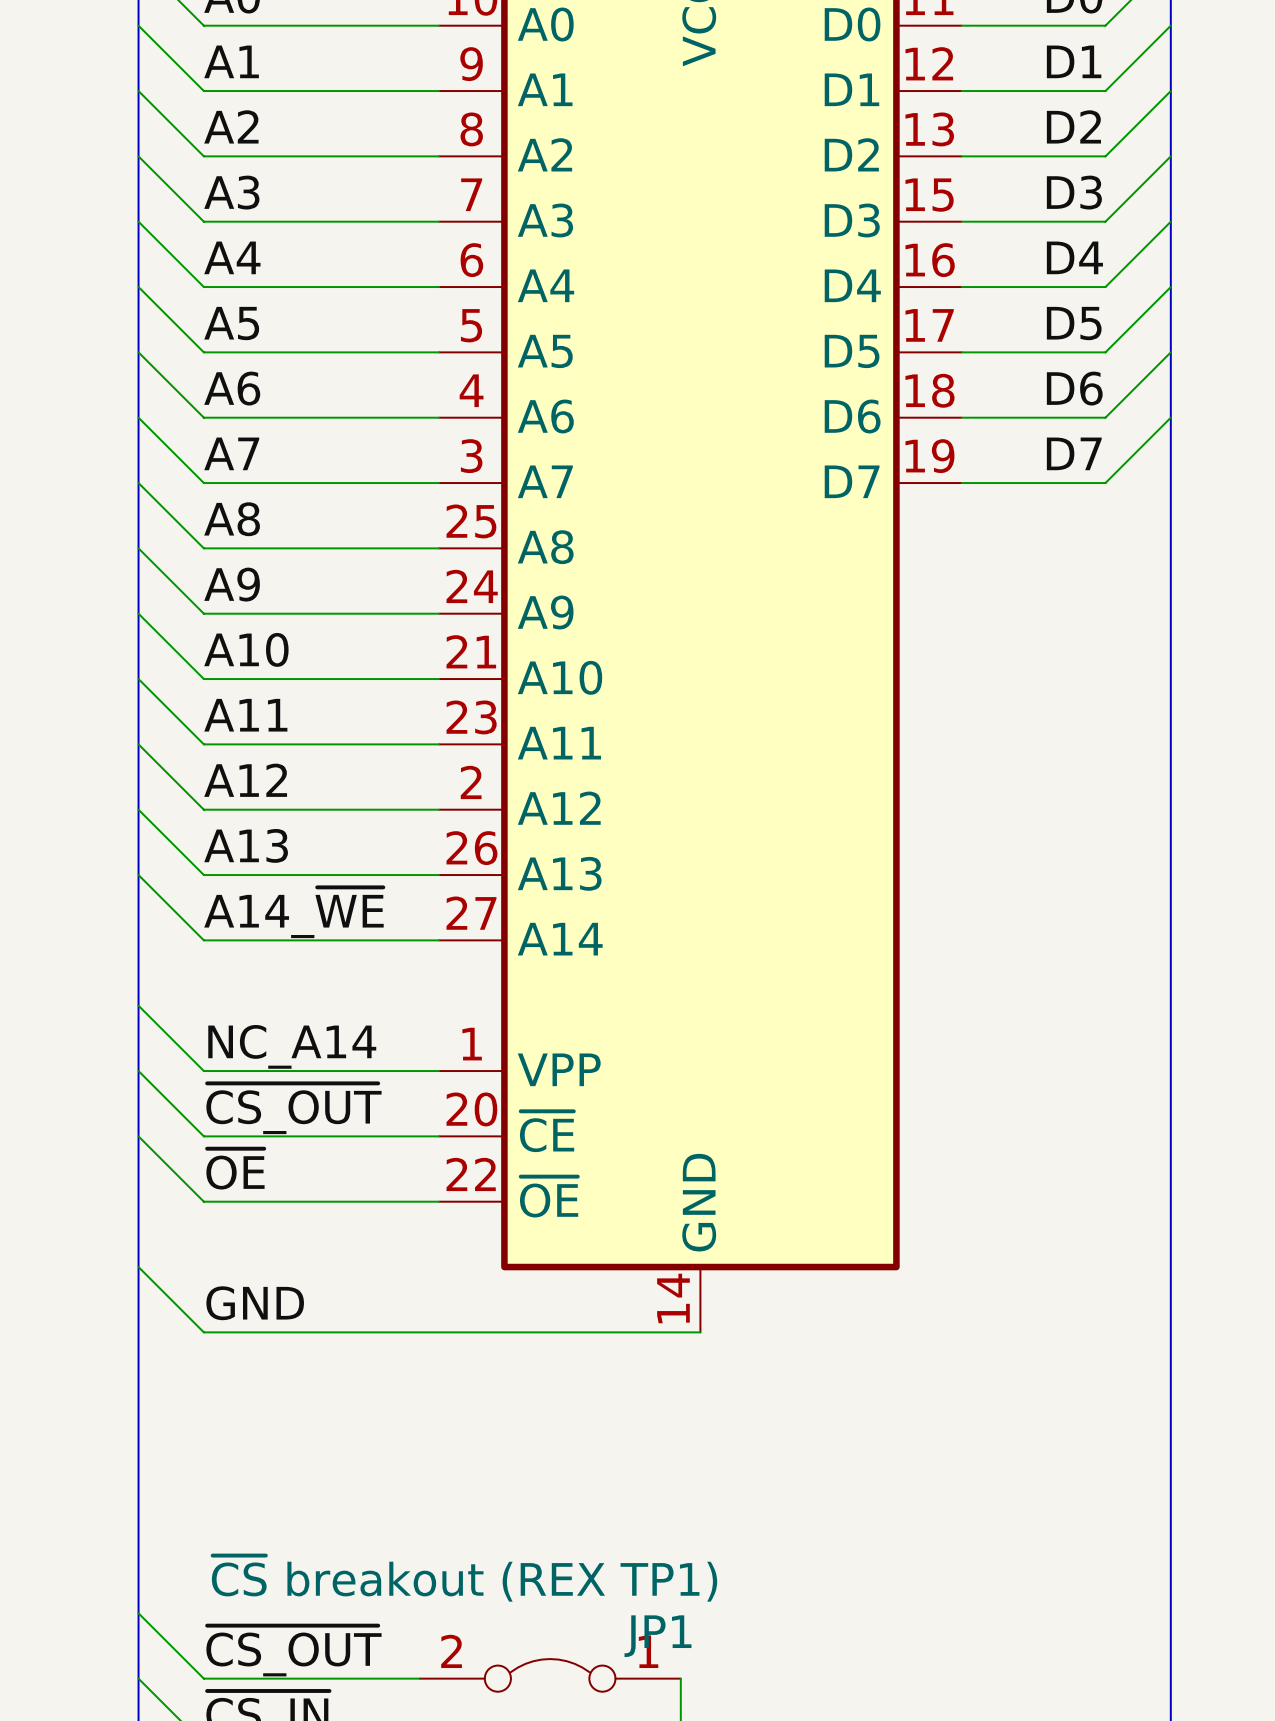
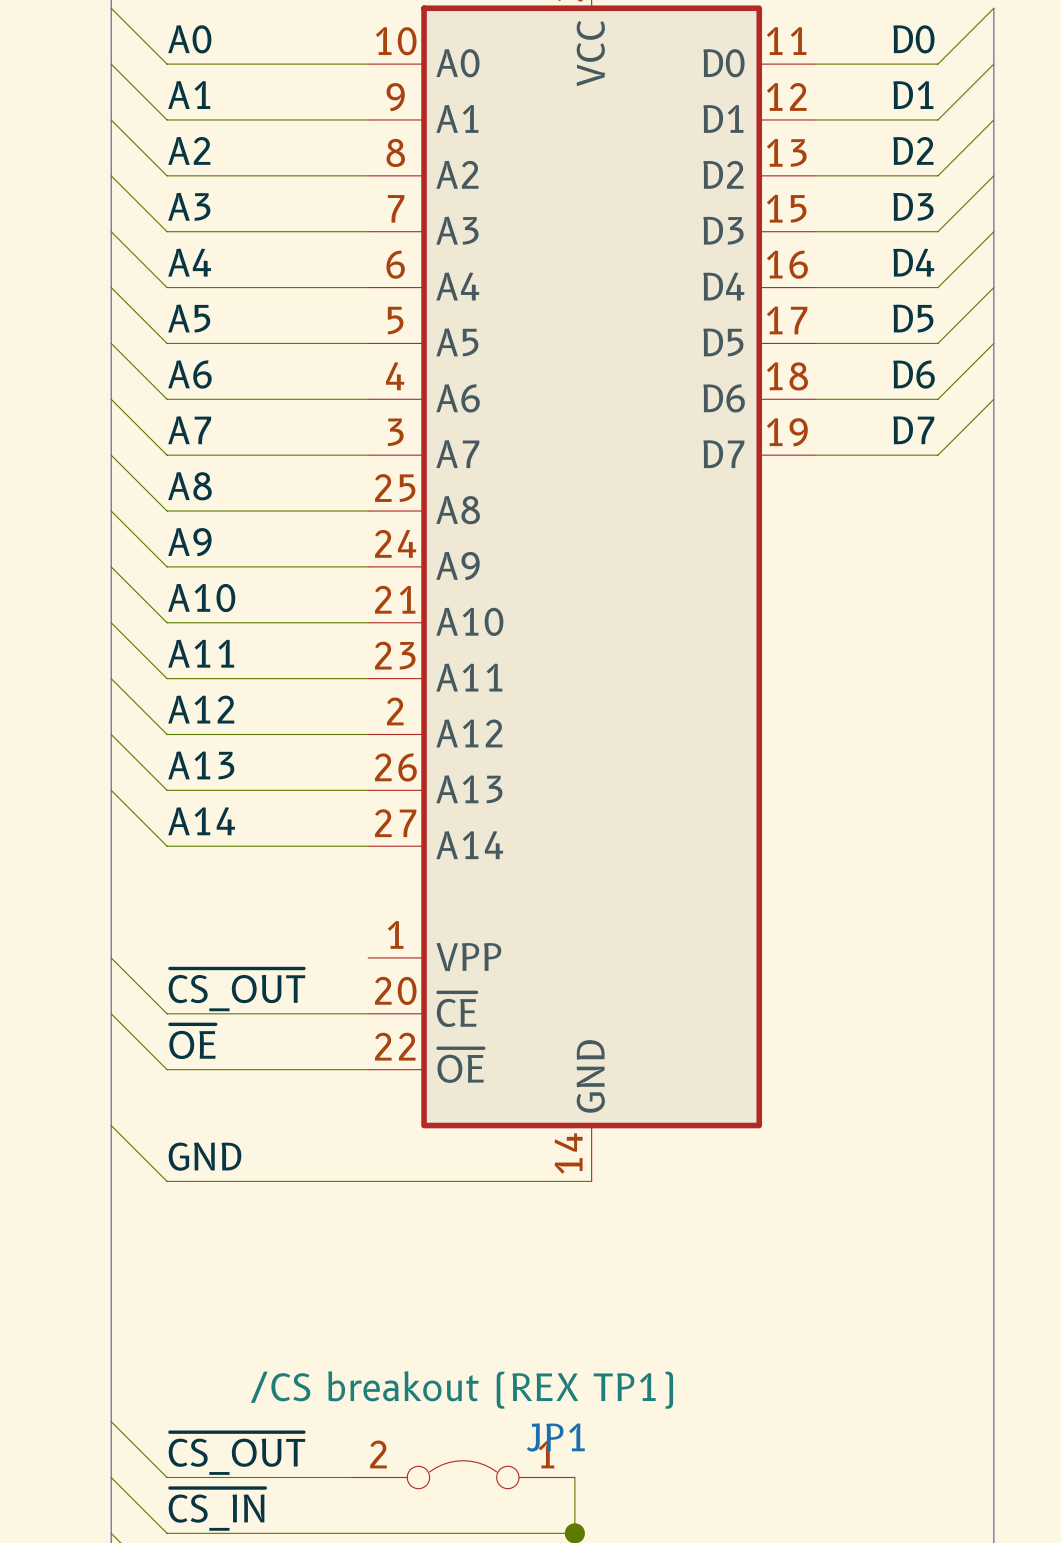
label: A14_~{WE} (293, 912) -> A14 (201, 821)
wire: (138, 1005) (203, 1071) (439, 1071) -> none
label: NC_A14 (292, 1046) -> none
JP1 value: ~{CS} breakout (REX TP1) (464, 1578) -> /CS breakout (REX TP1) (461, 1389)

